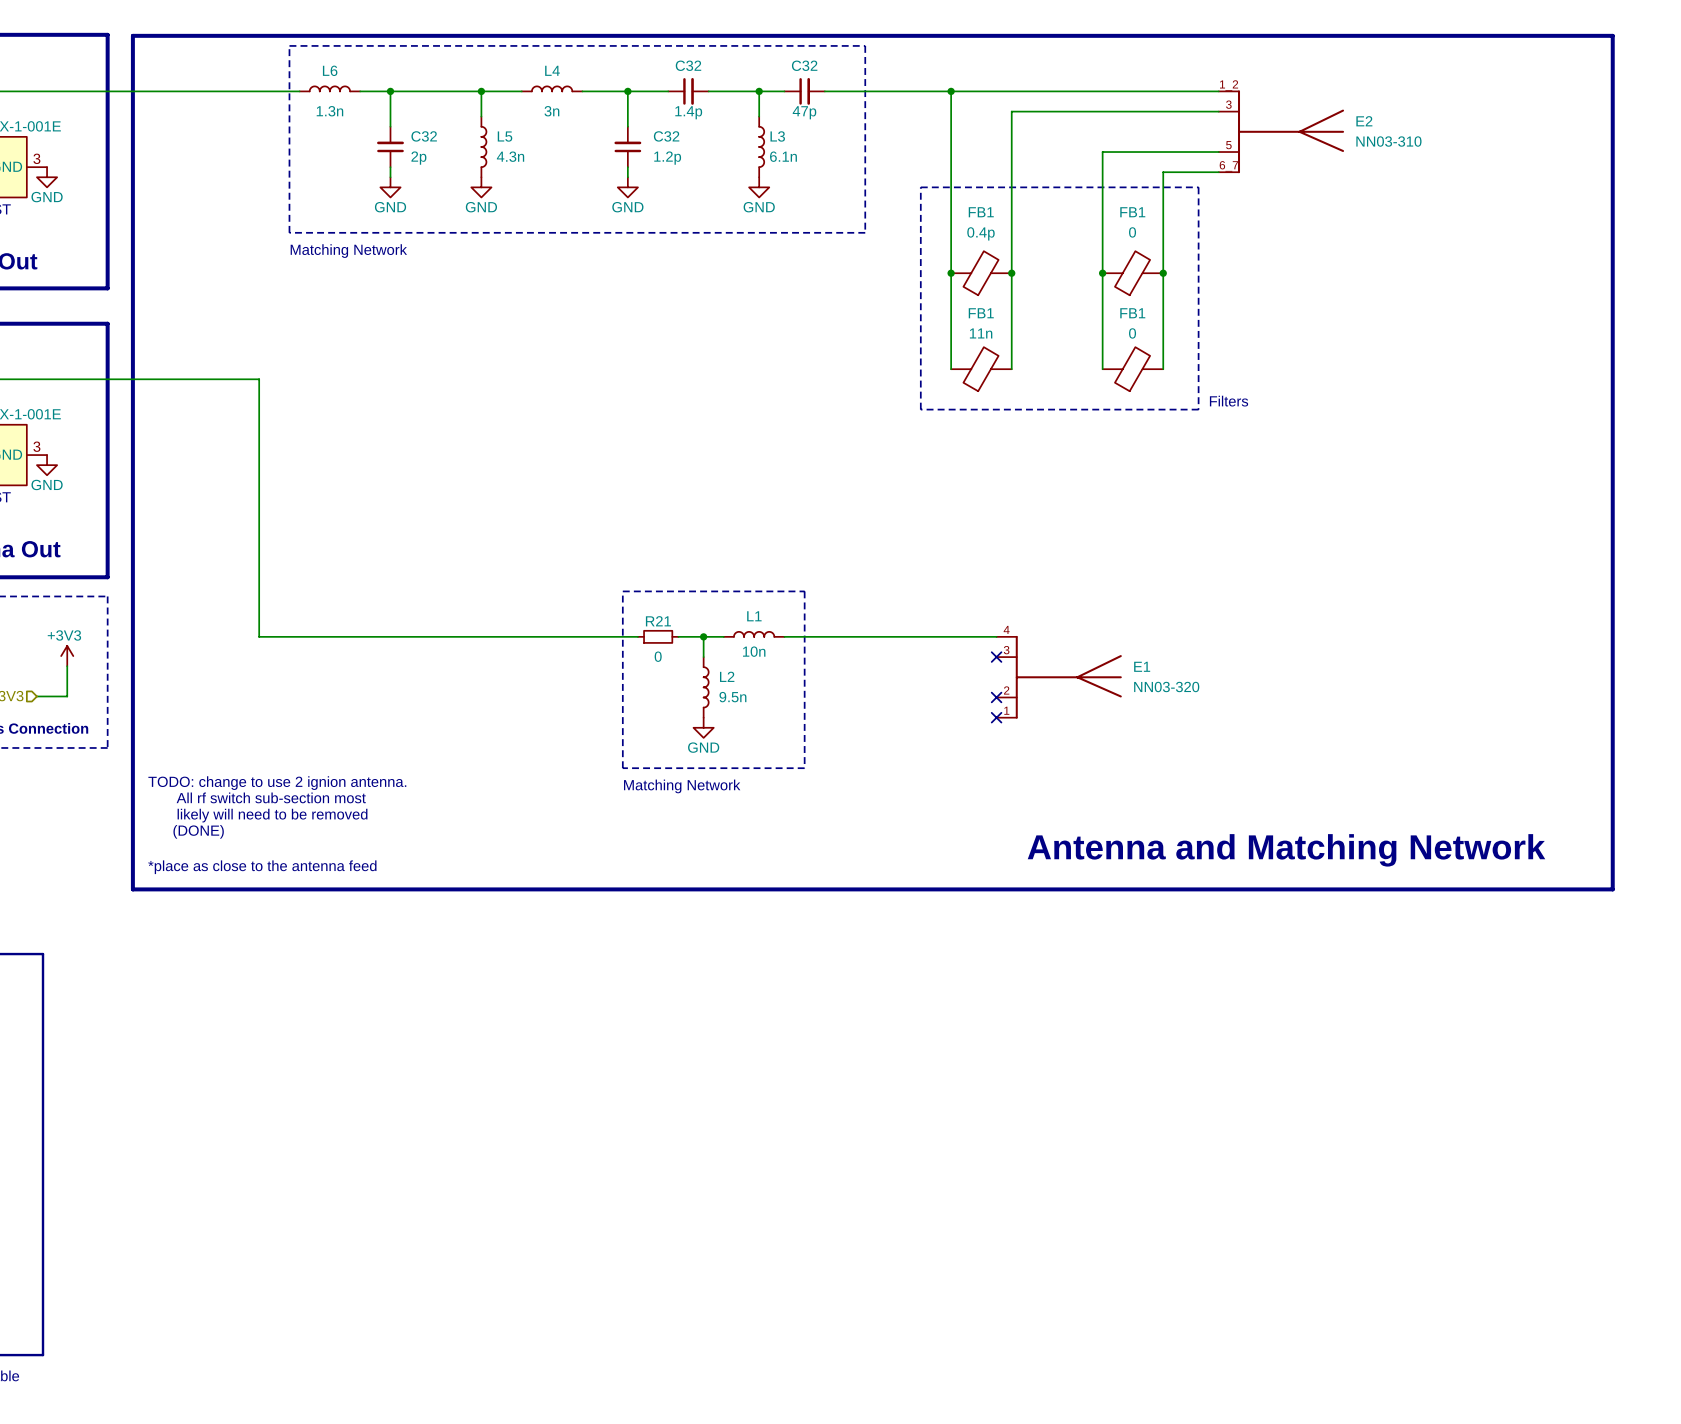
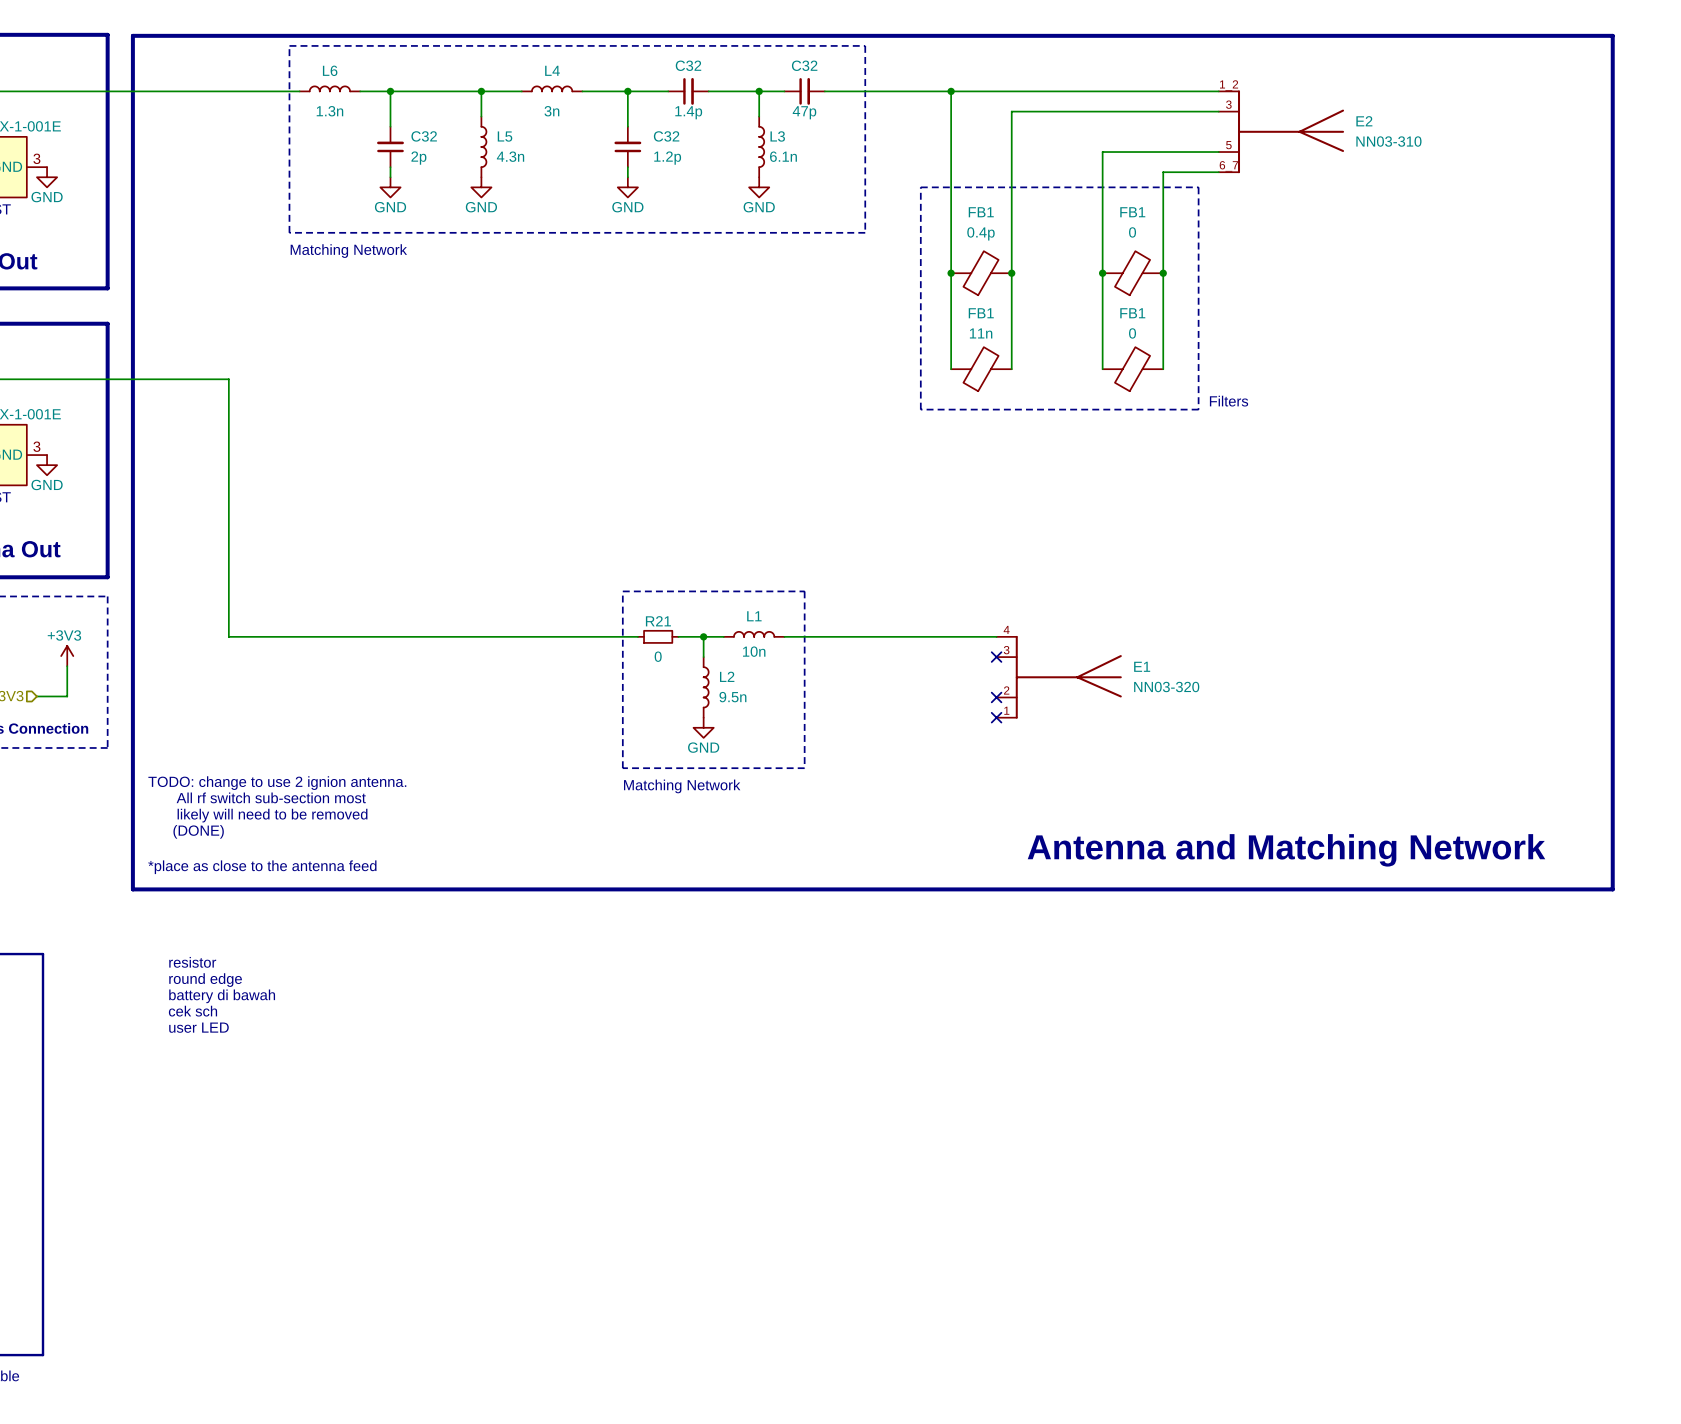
wire: (228, 379) (259, 379) (259, 636) -> (228, 379) (228, 636) (259, 636)
text: none -> resistor (192, 962)
text: none -> round edge (205, 980)
text: none -> battery di bawah (222, 996)
text: none -> cek sch (192, 1011)
text: none -> user LED (198, 1027)

